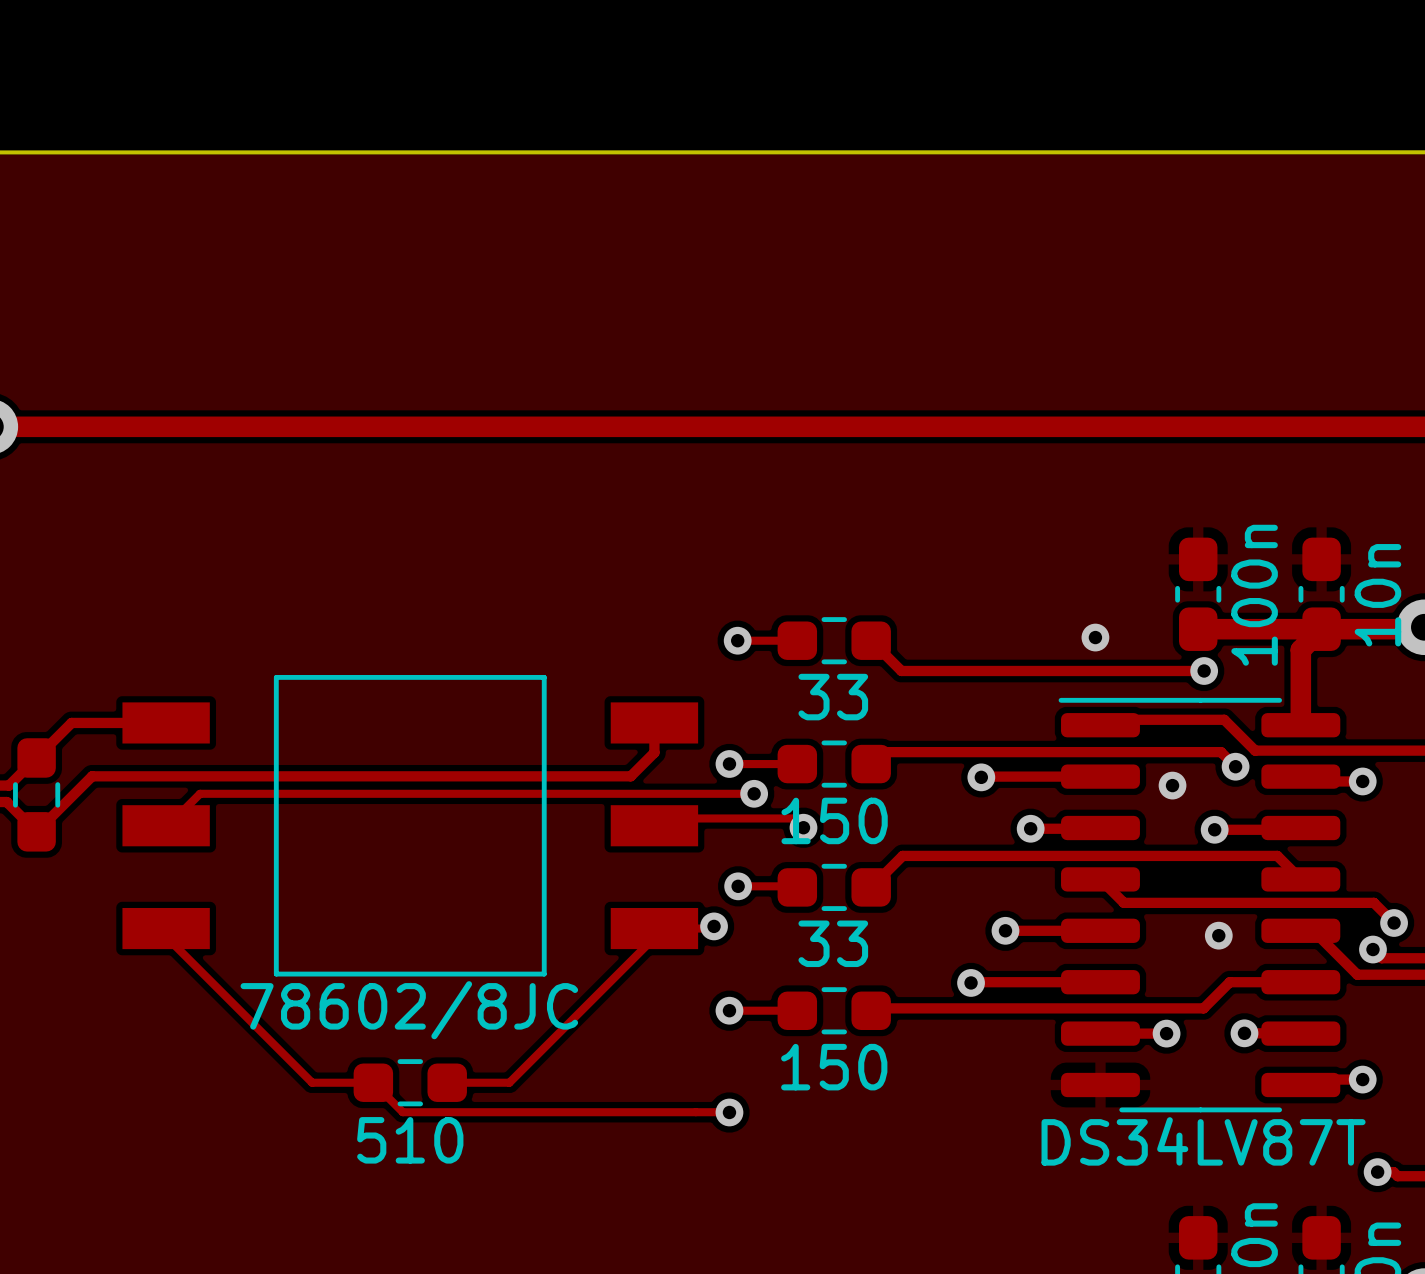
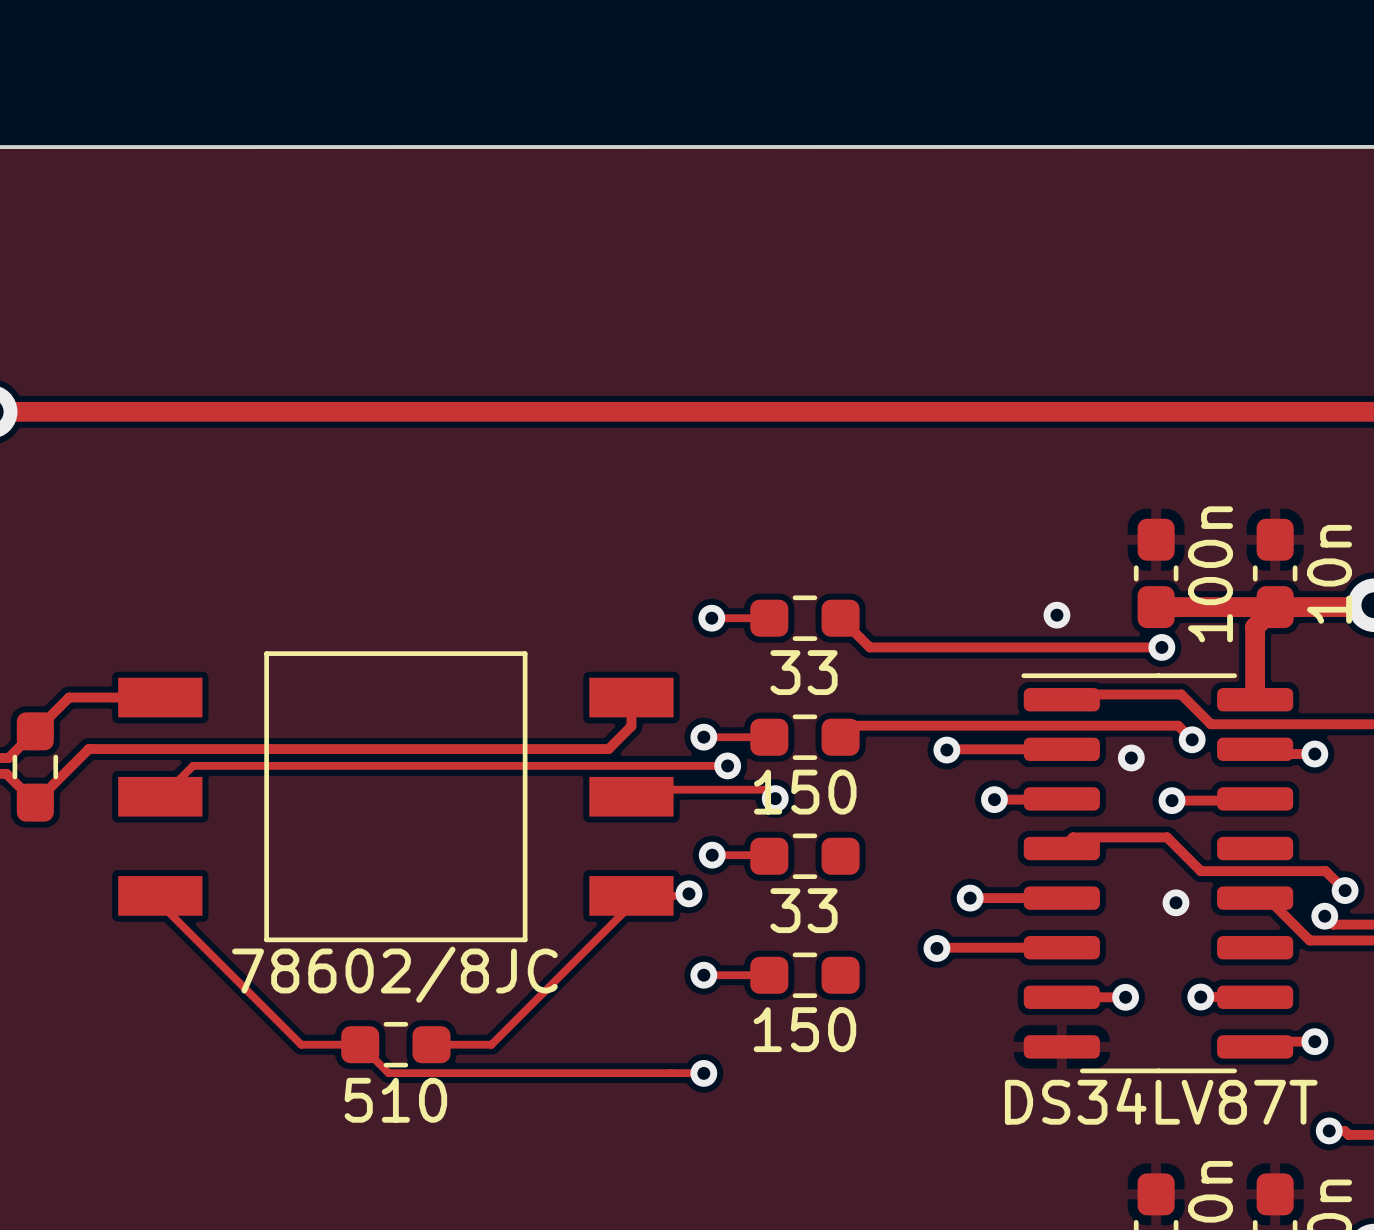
track: (1100, 879) (1123, 902) (1244, 902) -> (1061, 848) (1072, 837) (1167, 837) (1200, 871)
track: (1300, 879) (1277, 855) (902, 855) (871, 887) -> none
track: (1300, 982) (1229, 982) (1203, 1008) (873, 1008) (871, 1010) -> none

